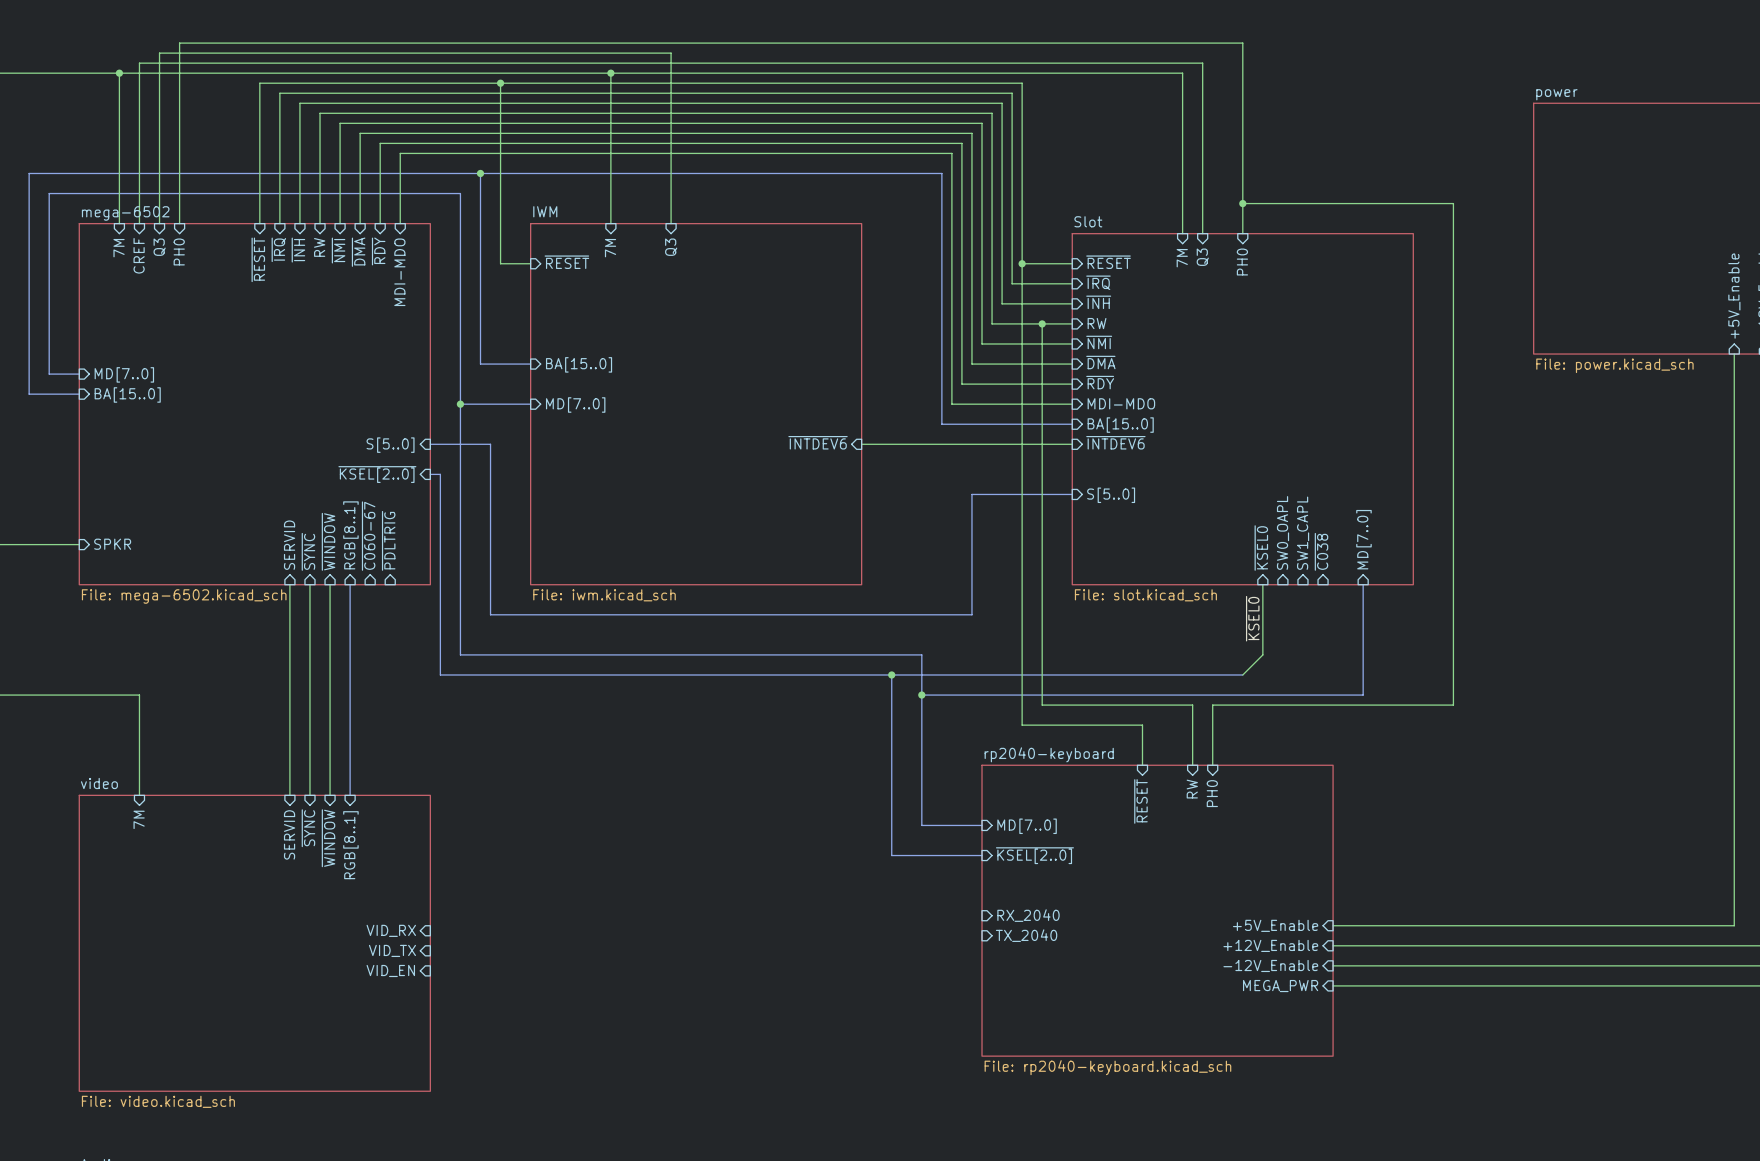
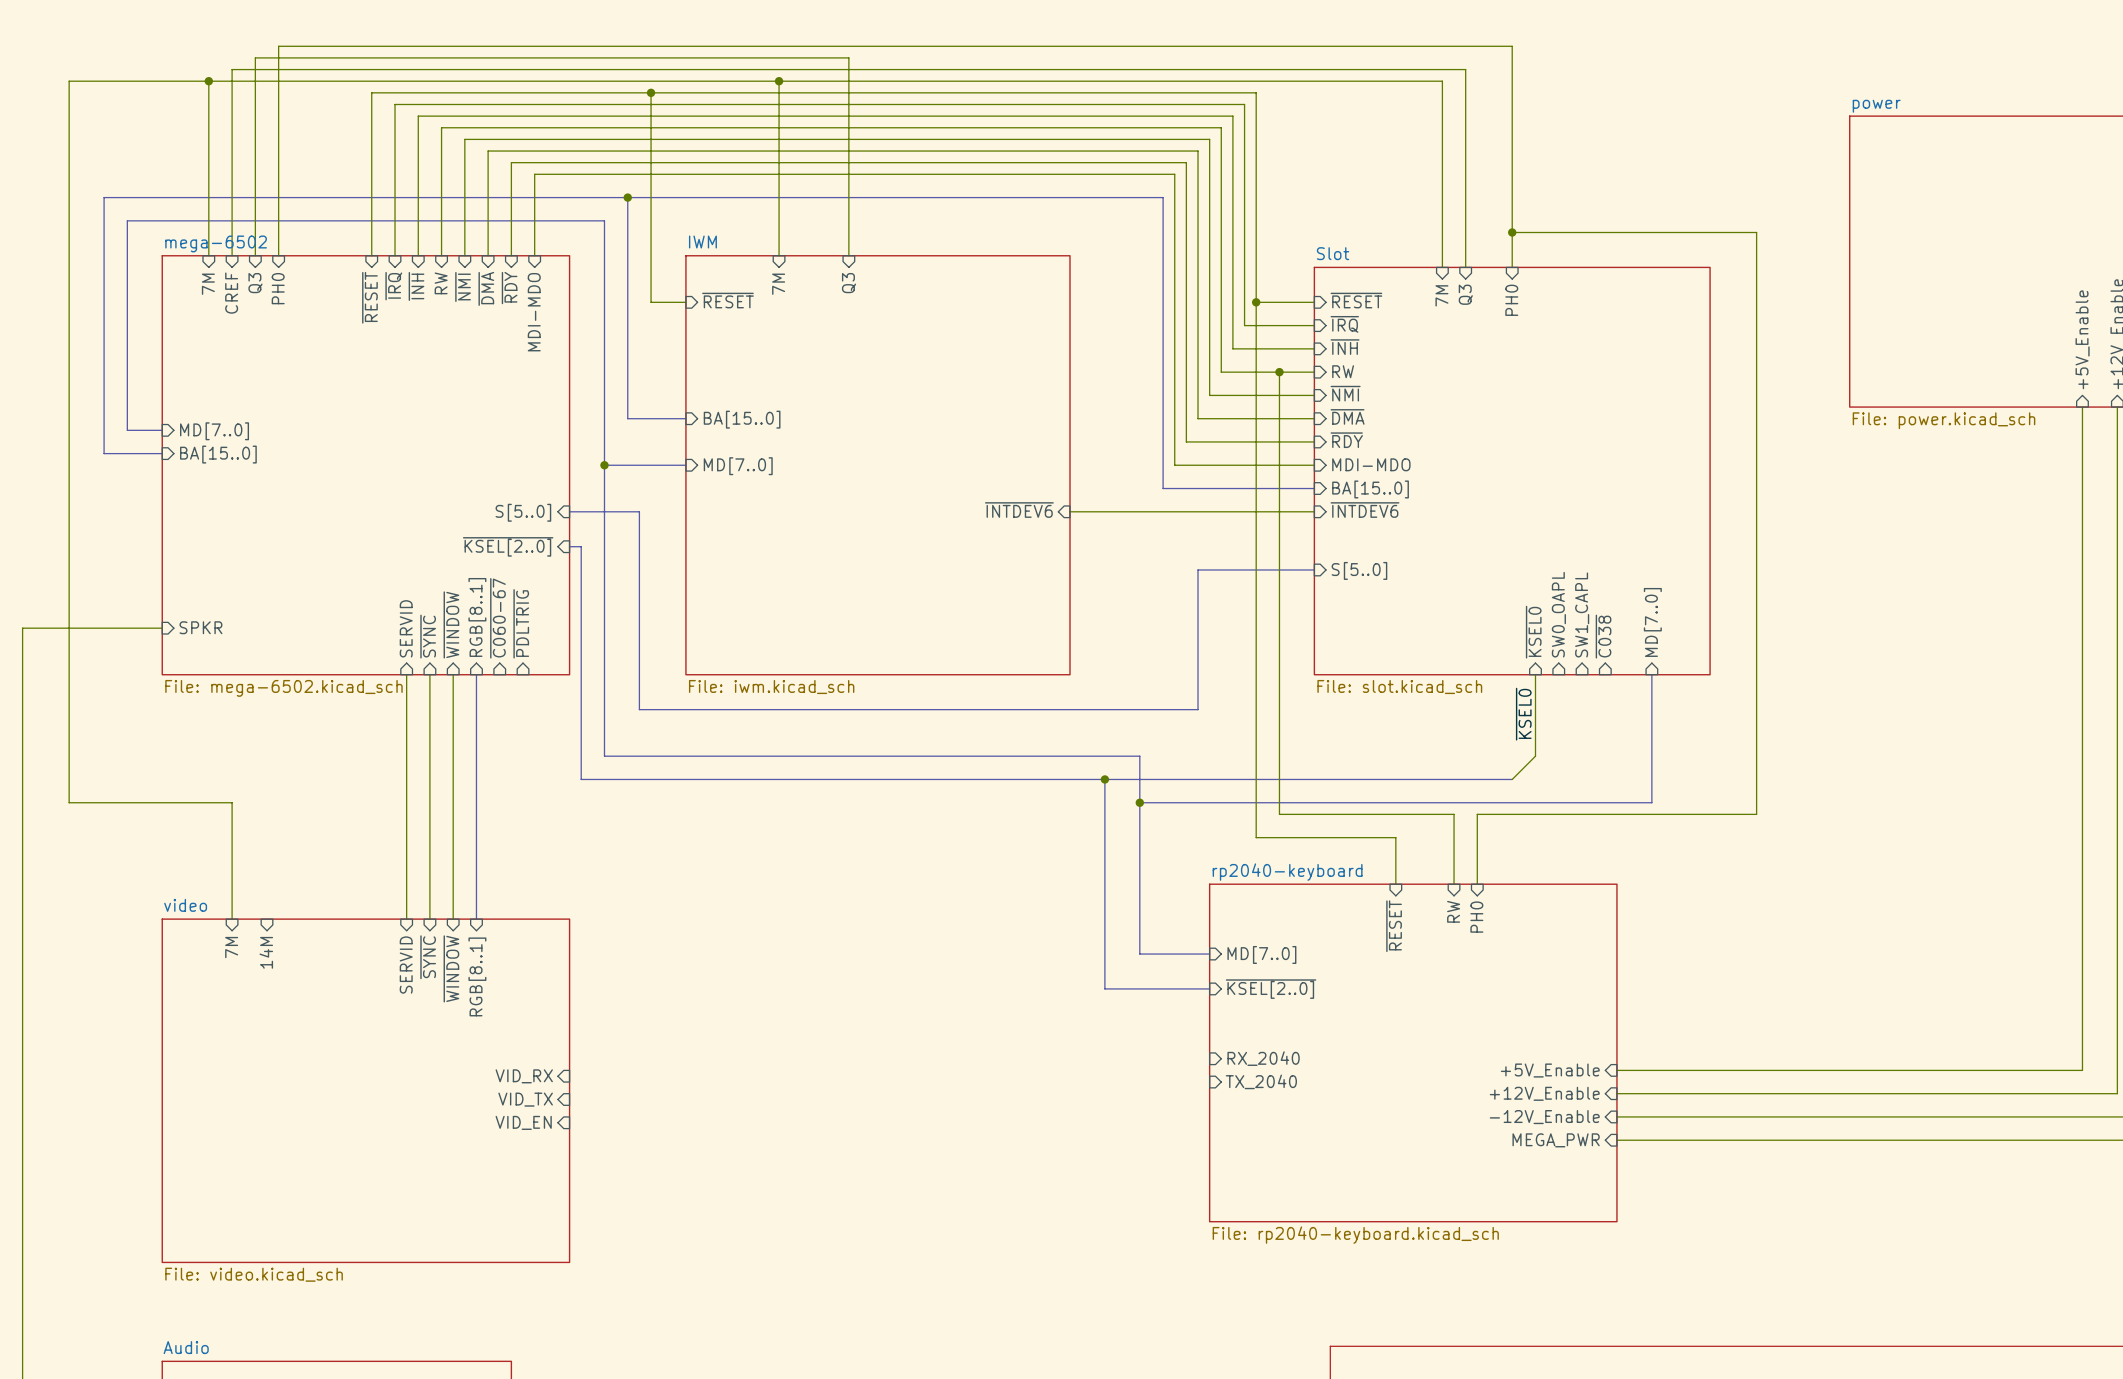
sheet pin: none -> 14M (266, 952)

